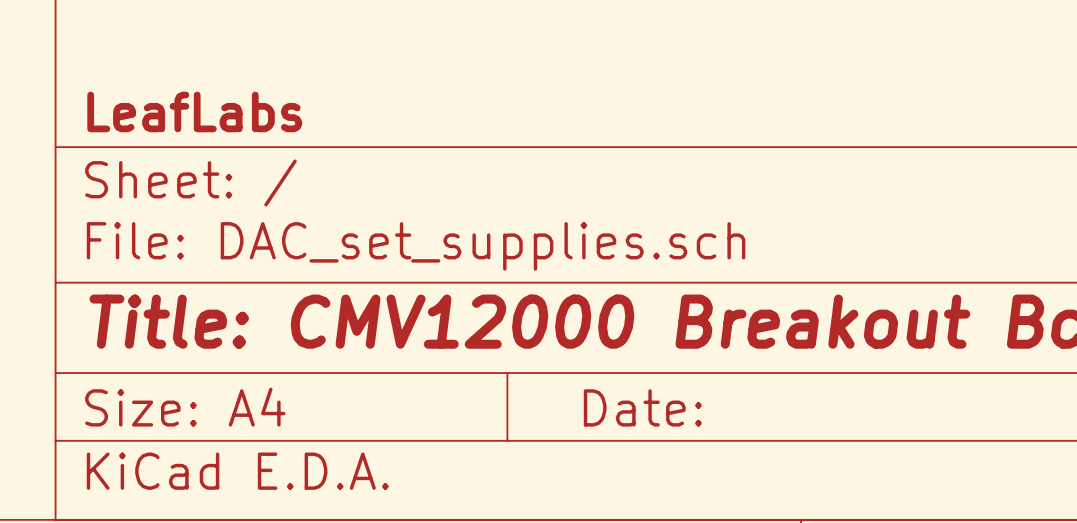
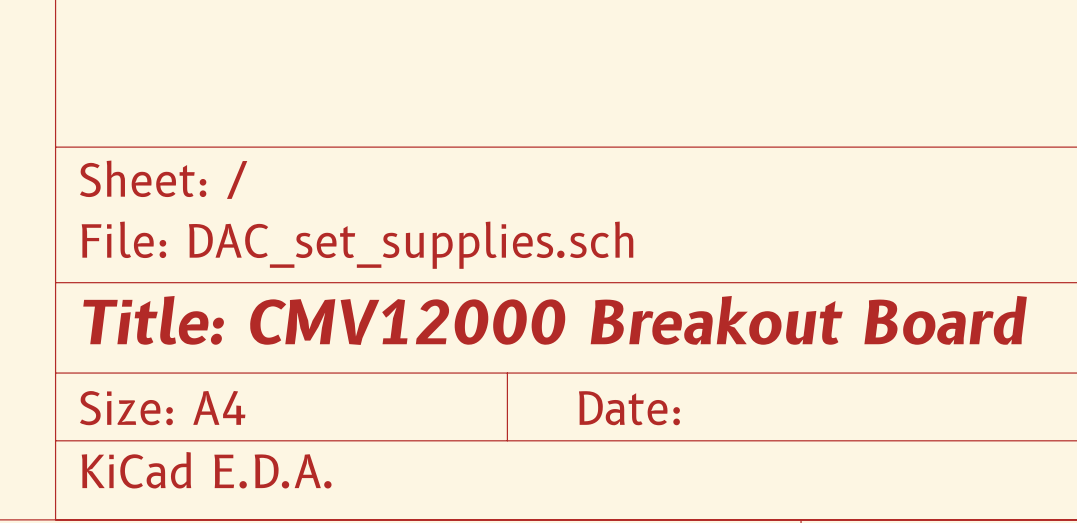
title block: LeafLabs (194, 111) -> none

